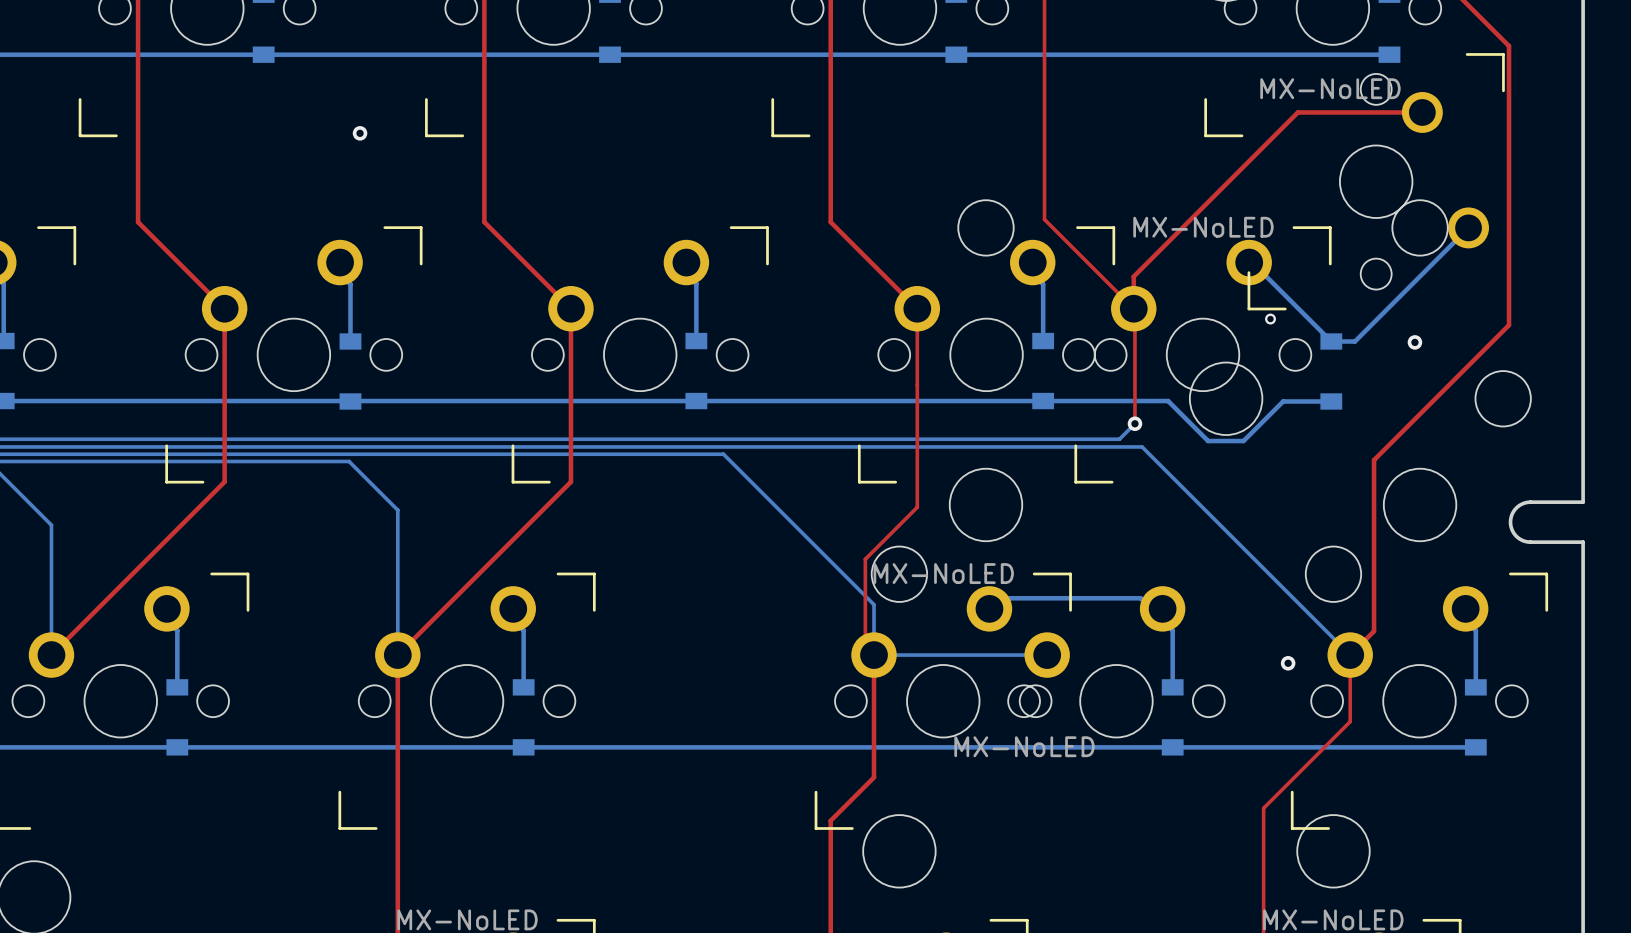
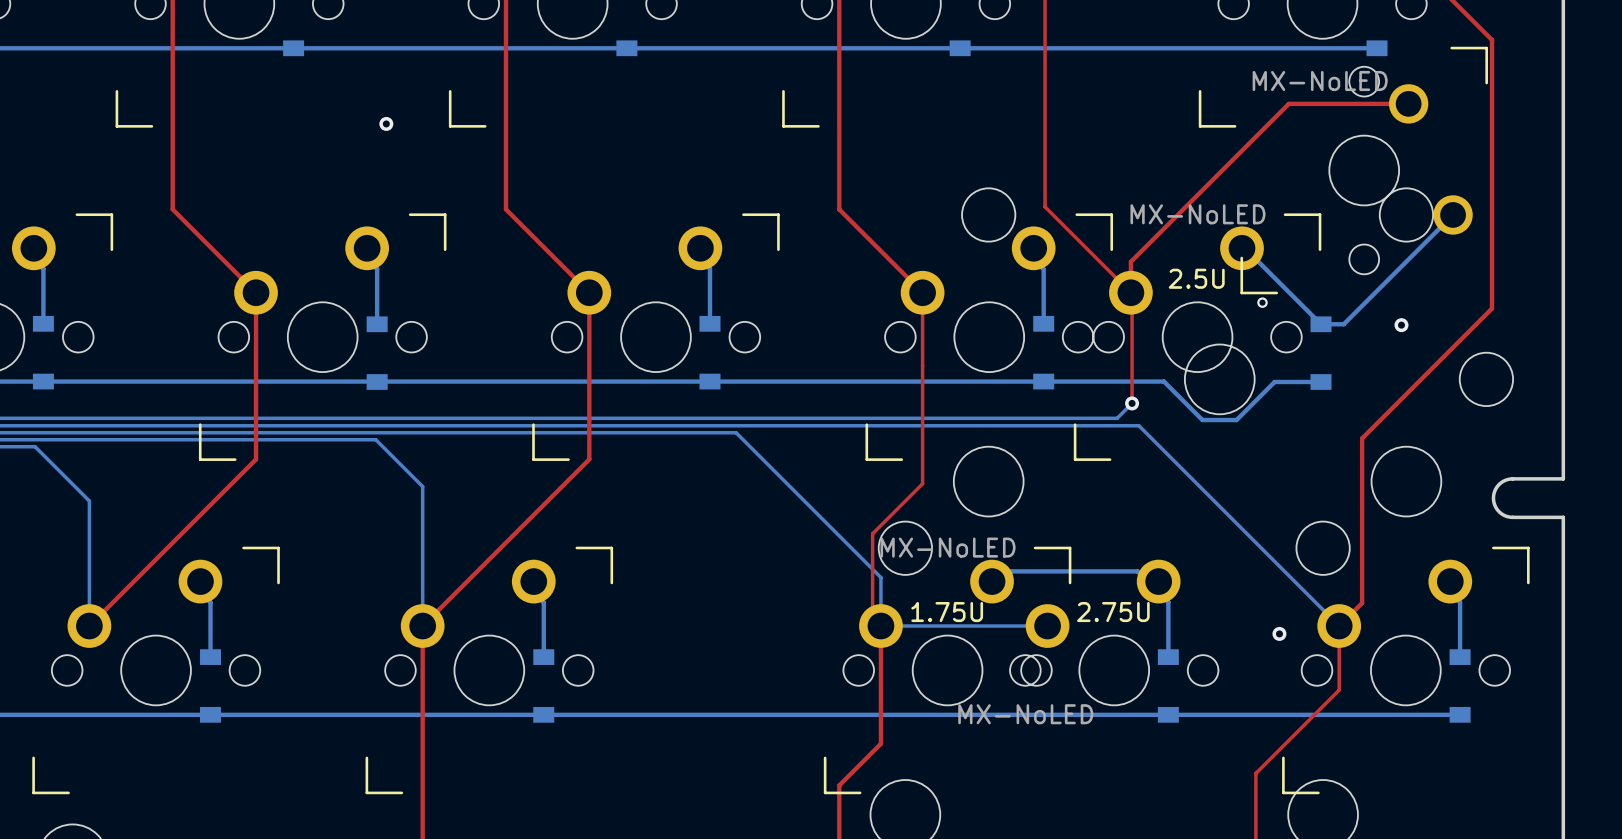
part text: none -> 2.5U (1196, 278)
part text: none -> 1.75U (947, 612)
part text: none -> 2.75U (1113, 612)

